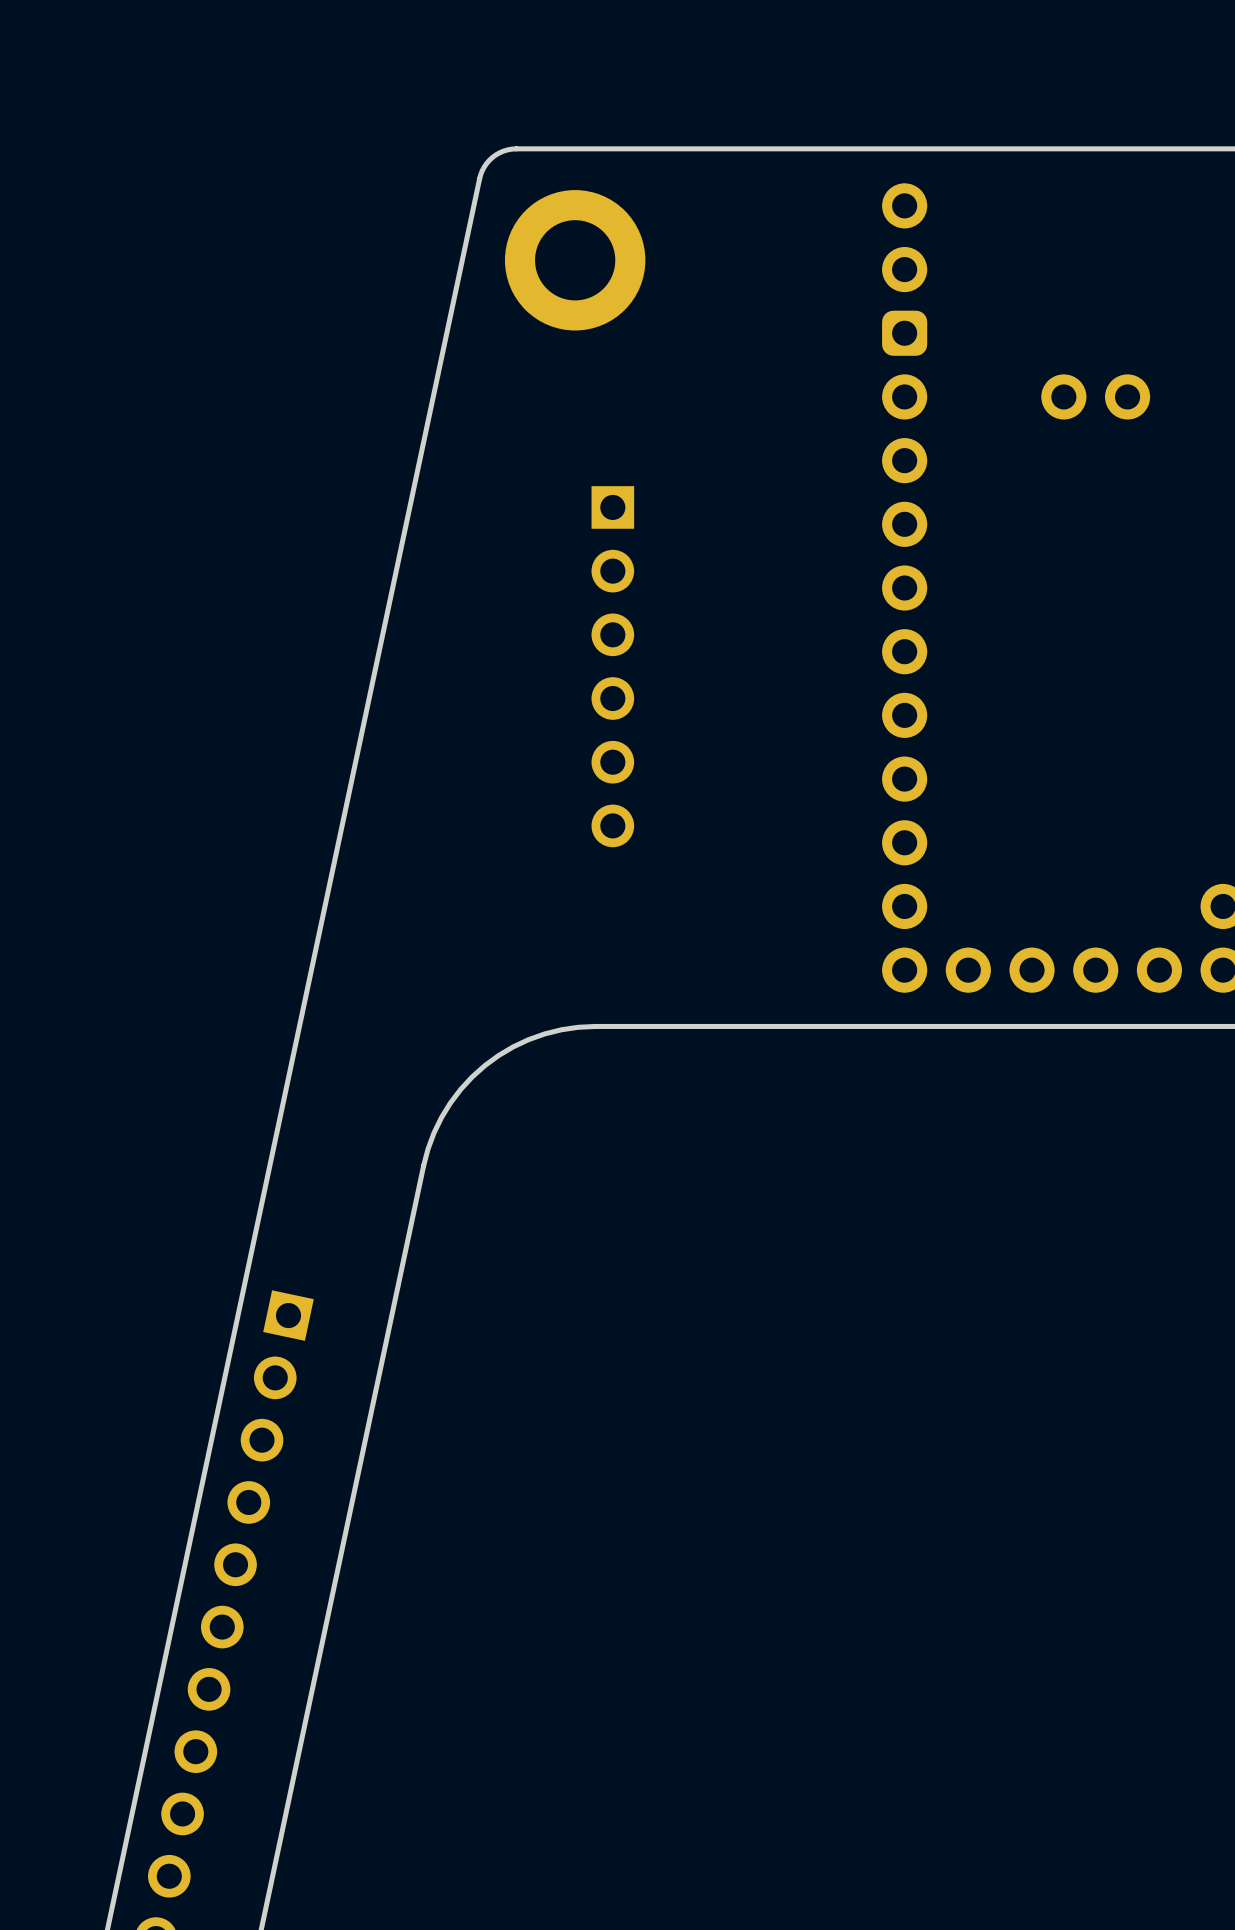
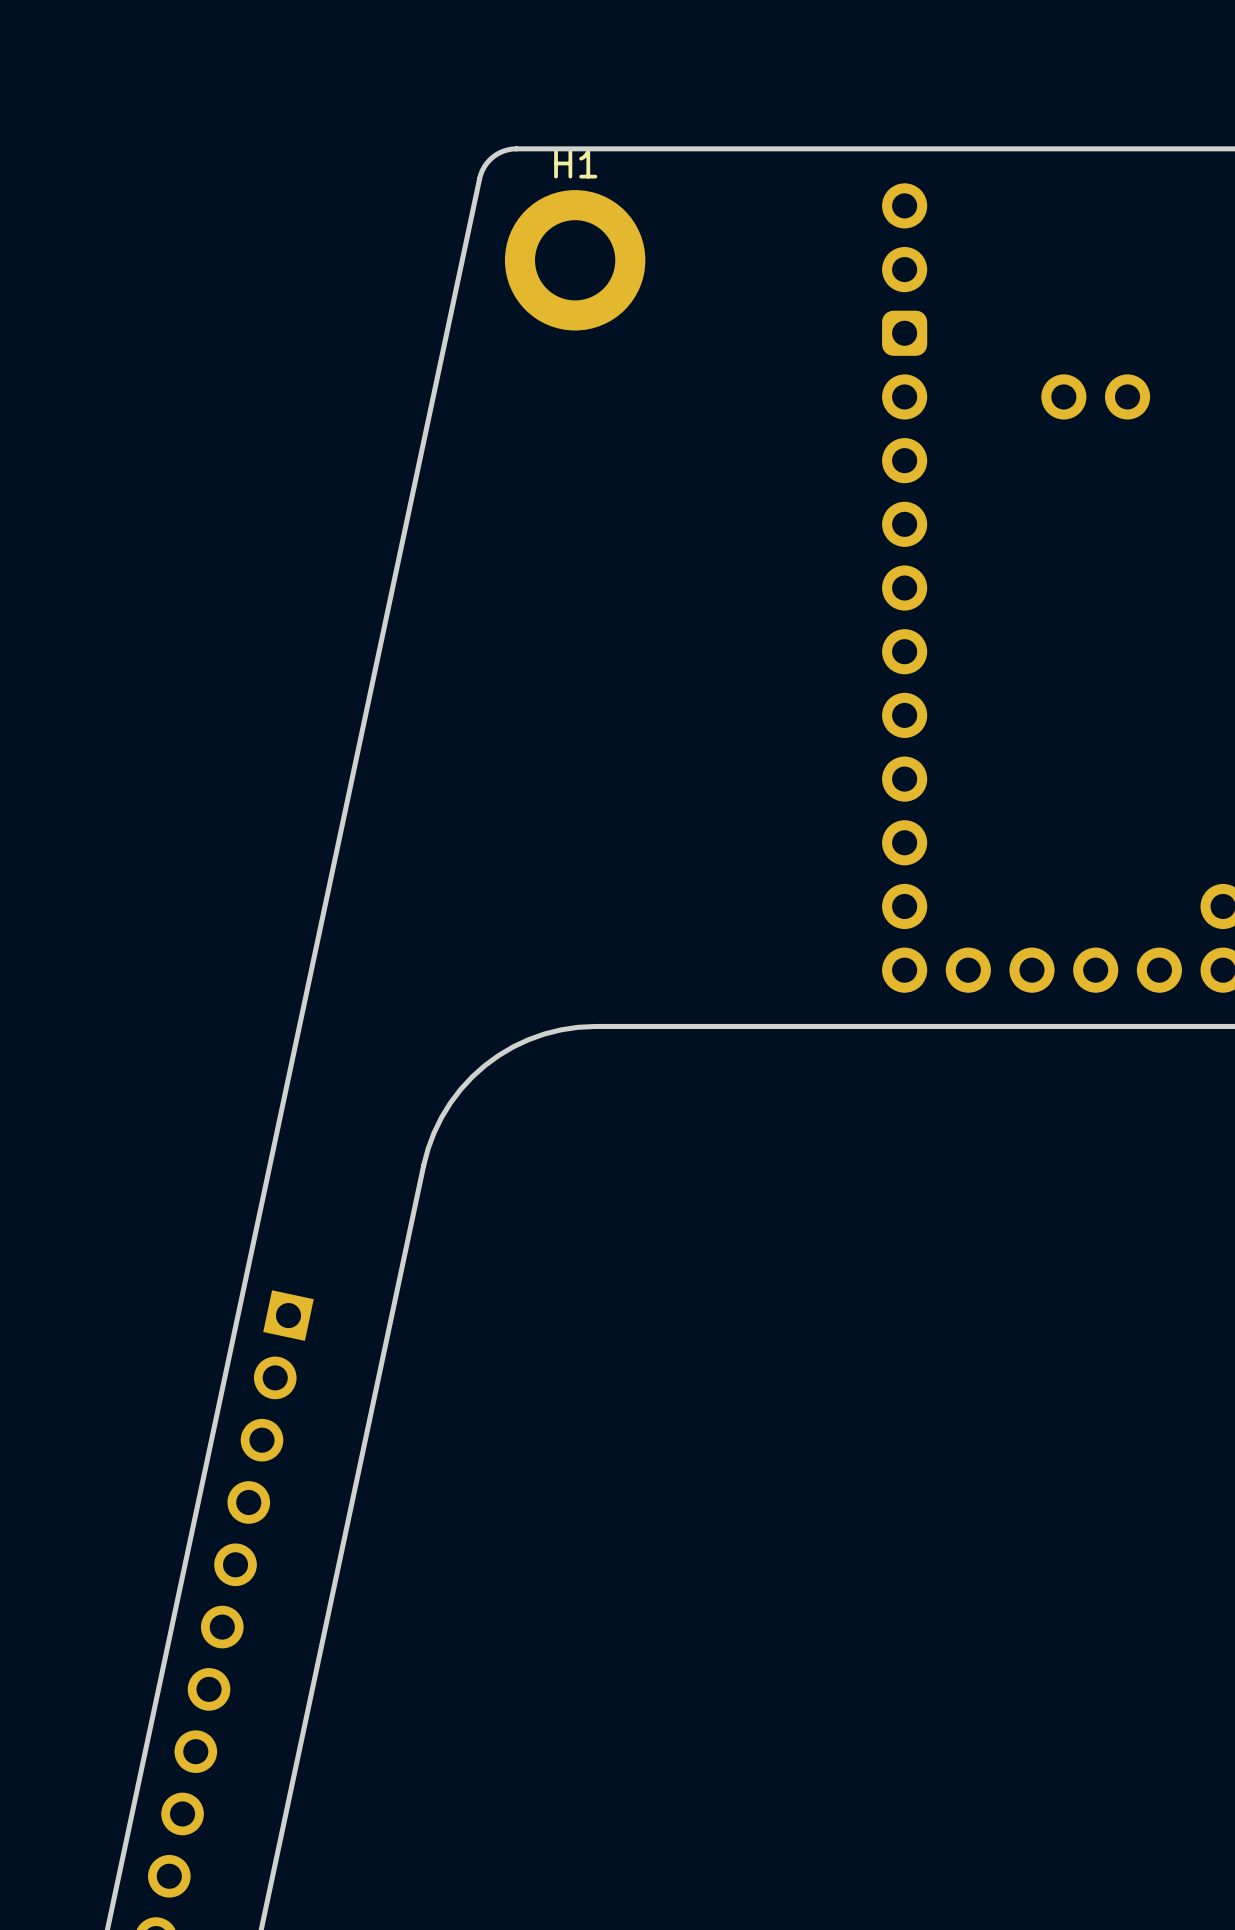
H1 name: none -> H1 (575, 164)
part: (612, 666) -> none

